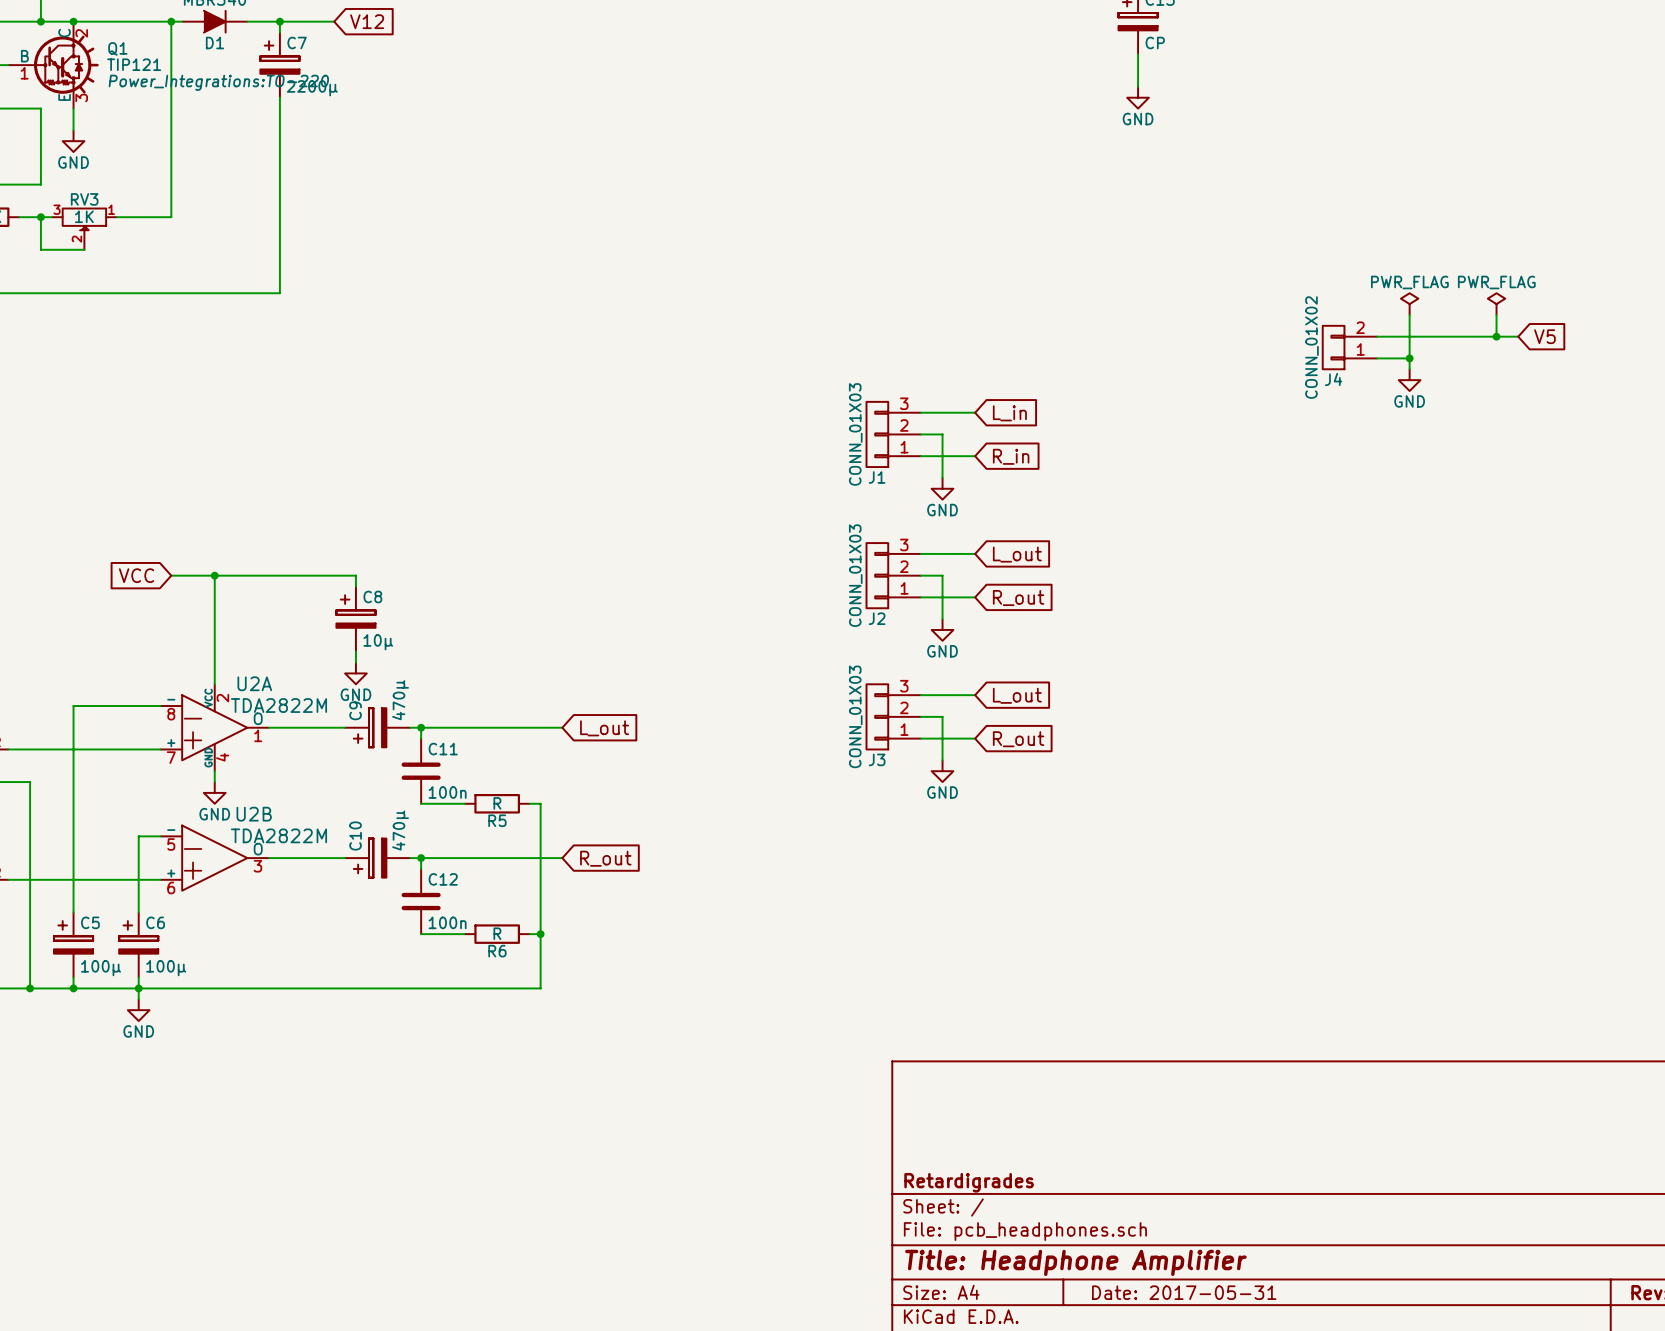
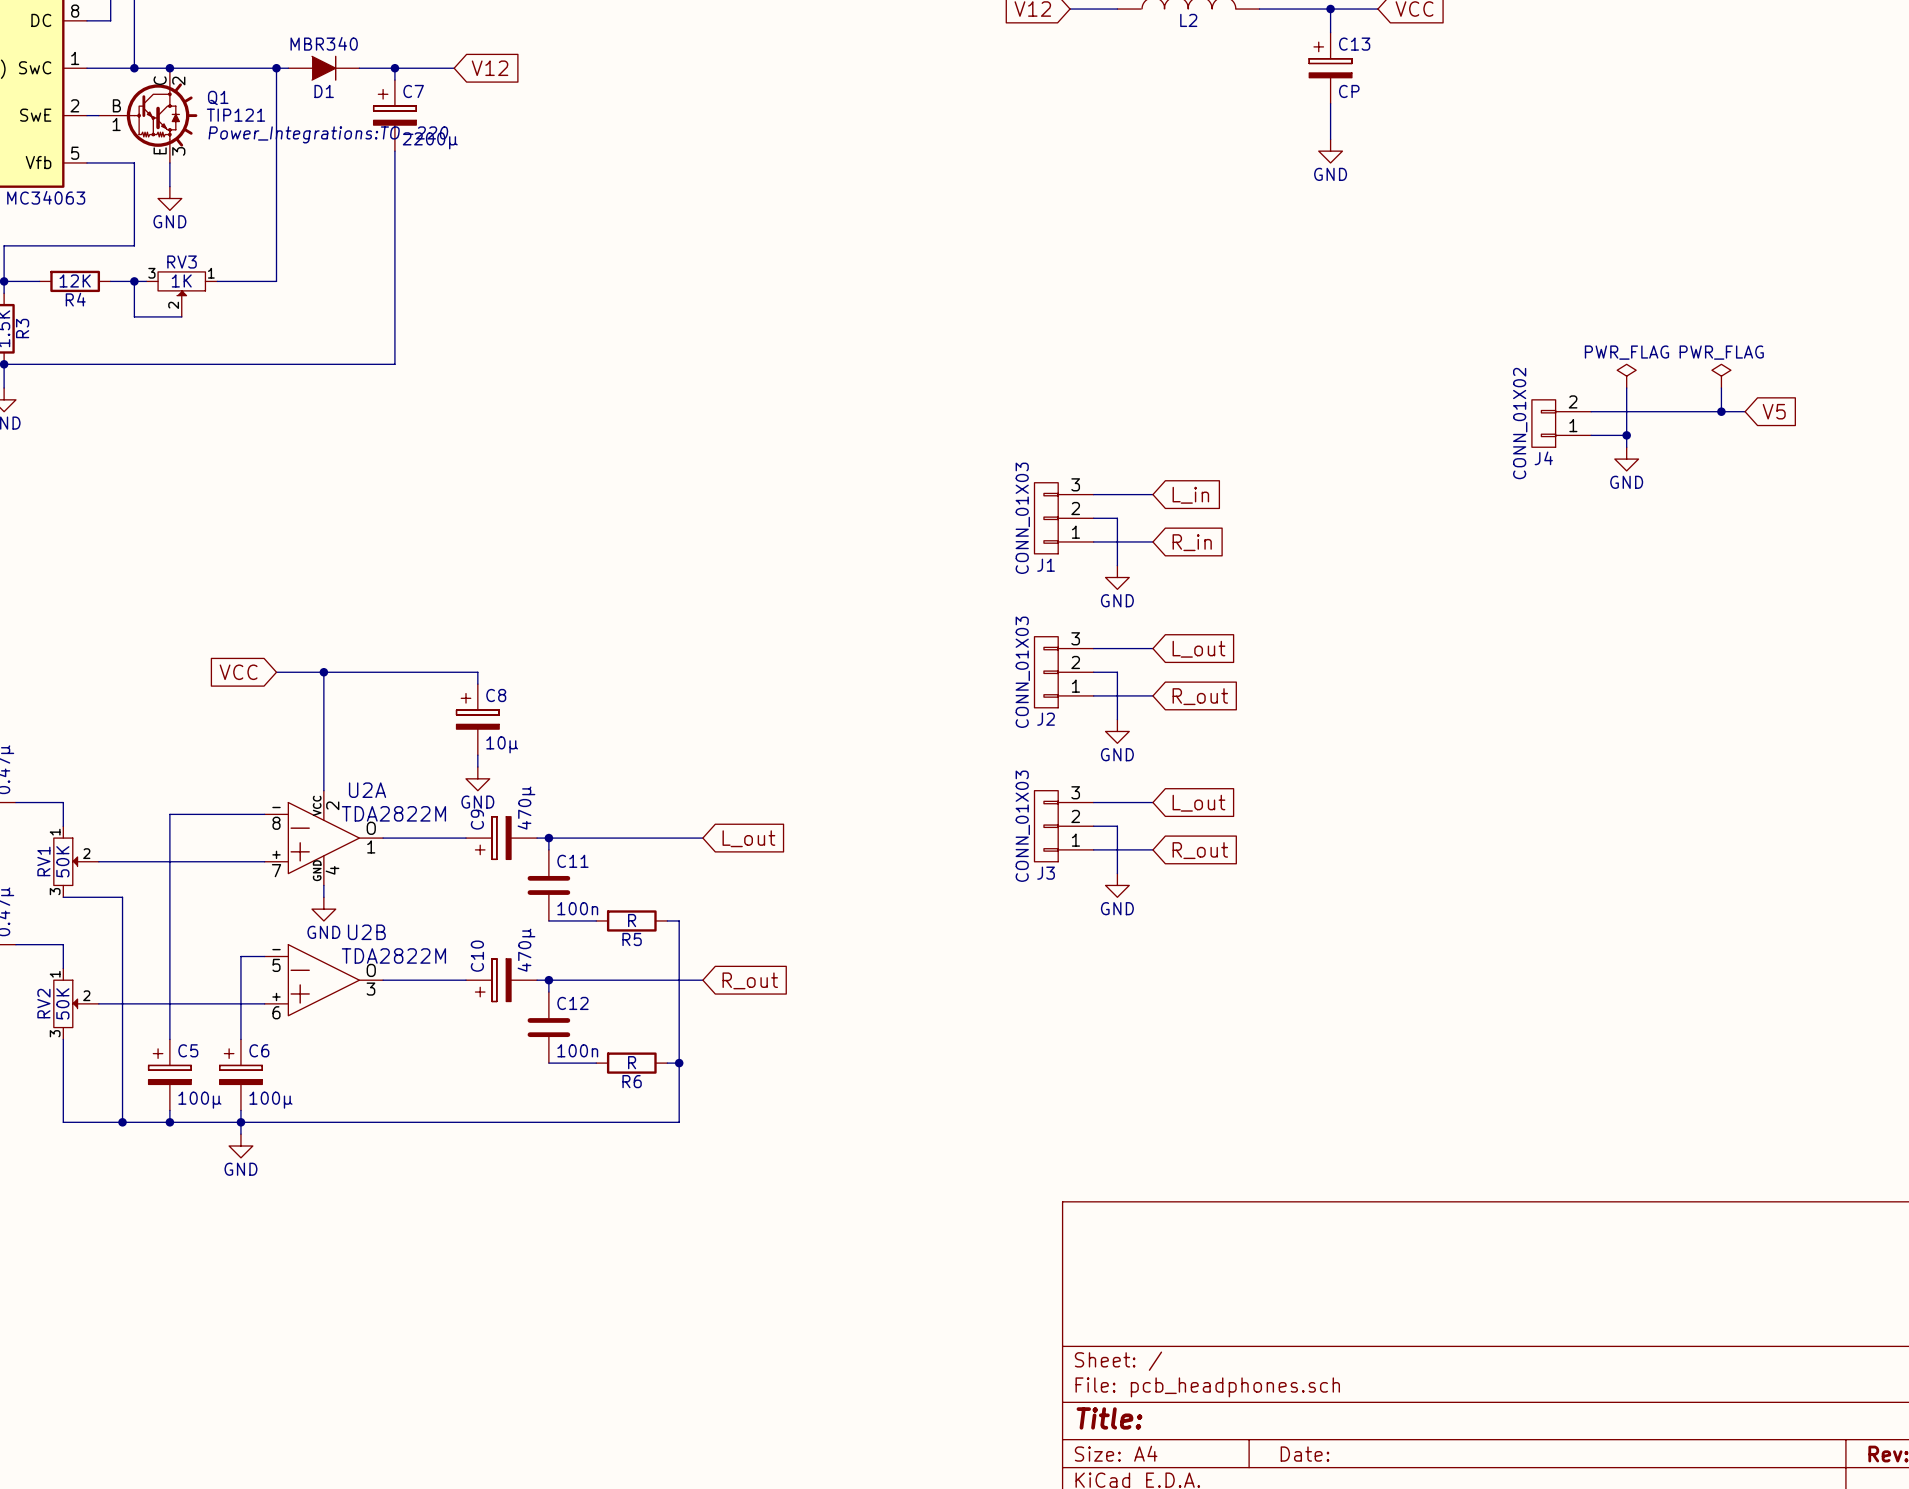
title block: Retardigrades (969, 1182) -> none
title block: Title: Headphone Amplifier (1075, 1262) -> Title: (1109, 1418)
title block: Date: 2017-05-31 (1184, 1292) -> Date: (1304, 1454)

